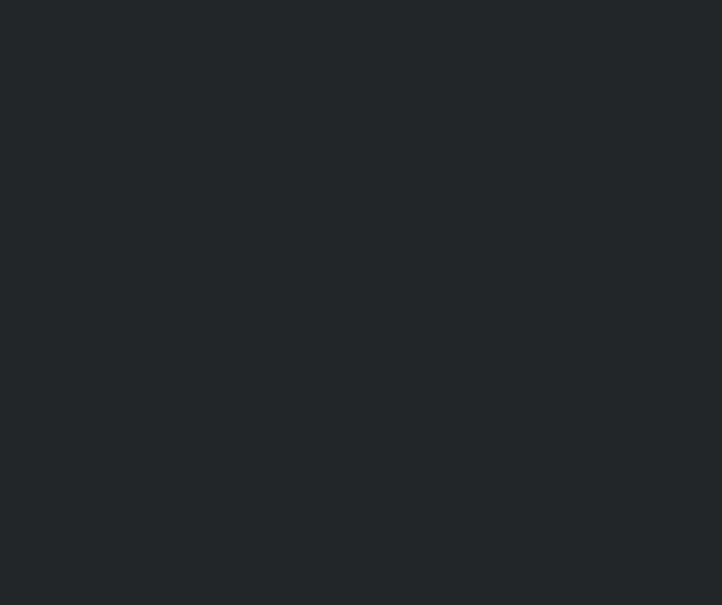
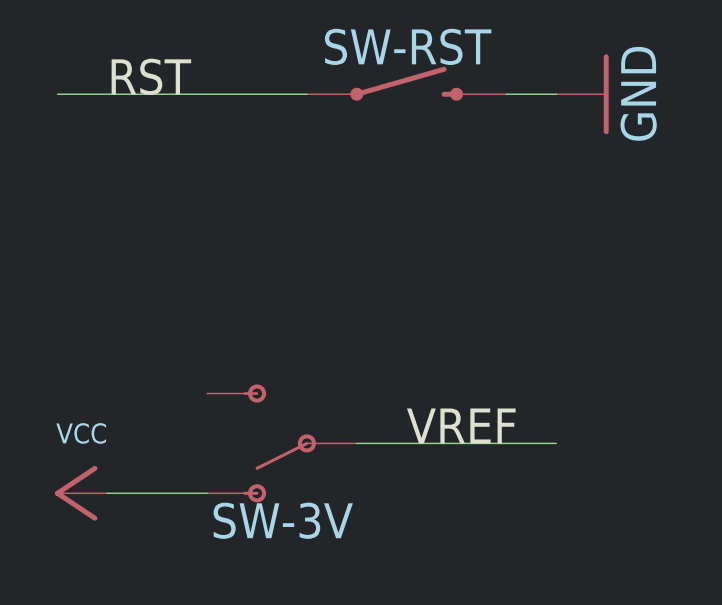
label: none -> RST (151, 76)
SW-RST: none -> (406, 83)
wire: none -> (57, 94) (306, 94)
wire: none -> (506, 94) (556, 94)
power symbol: none -> GND (582, 94)
label: none -> VREF (461, 425)
SW-3V: none -> (281, 443)
wire: none -> (356, 443) (556, 443)
power symbol: none -> VCC (81, 493)
wire: none -> (107, 493) (207, 493)

